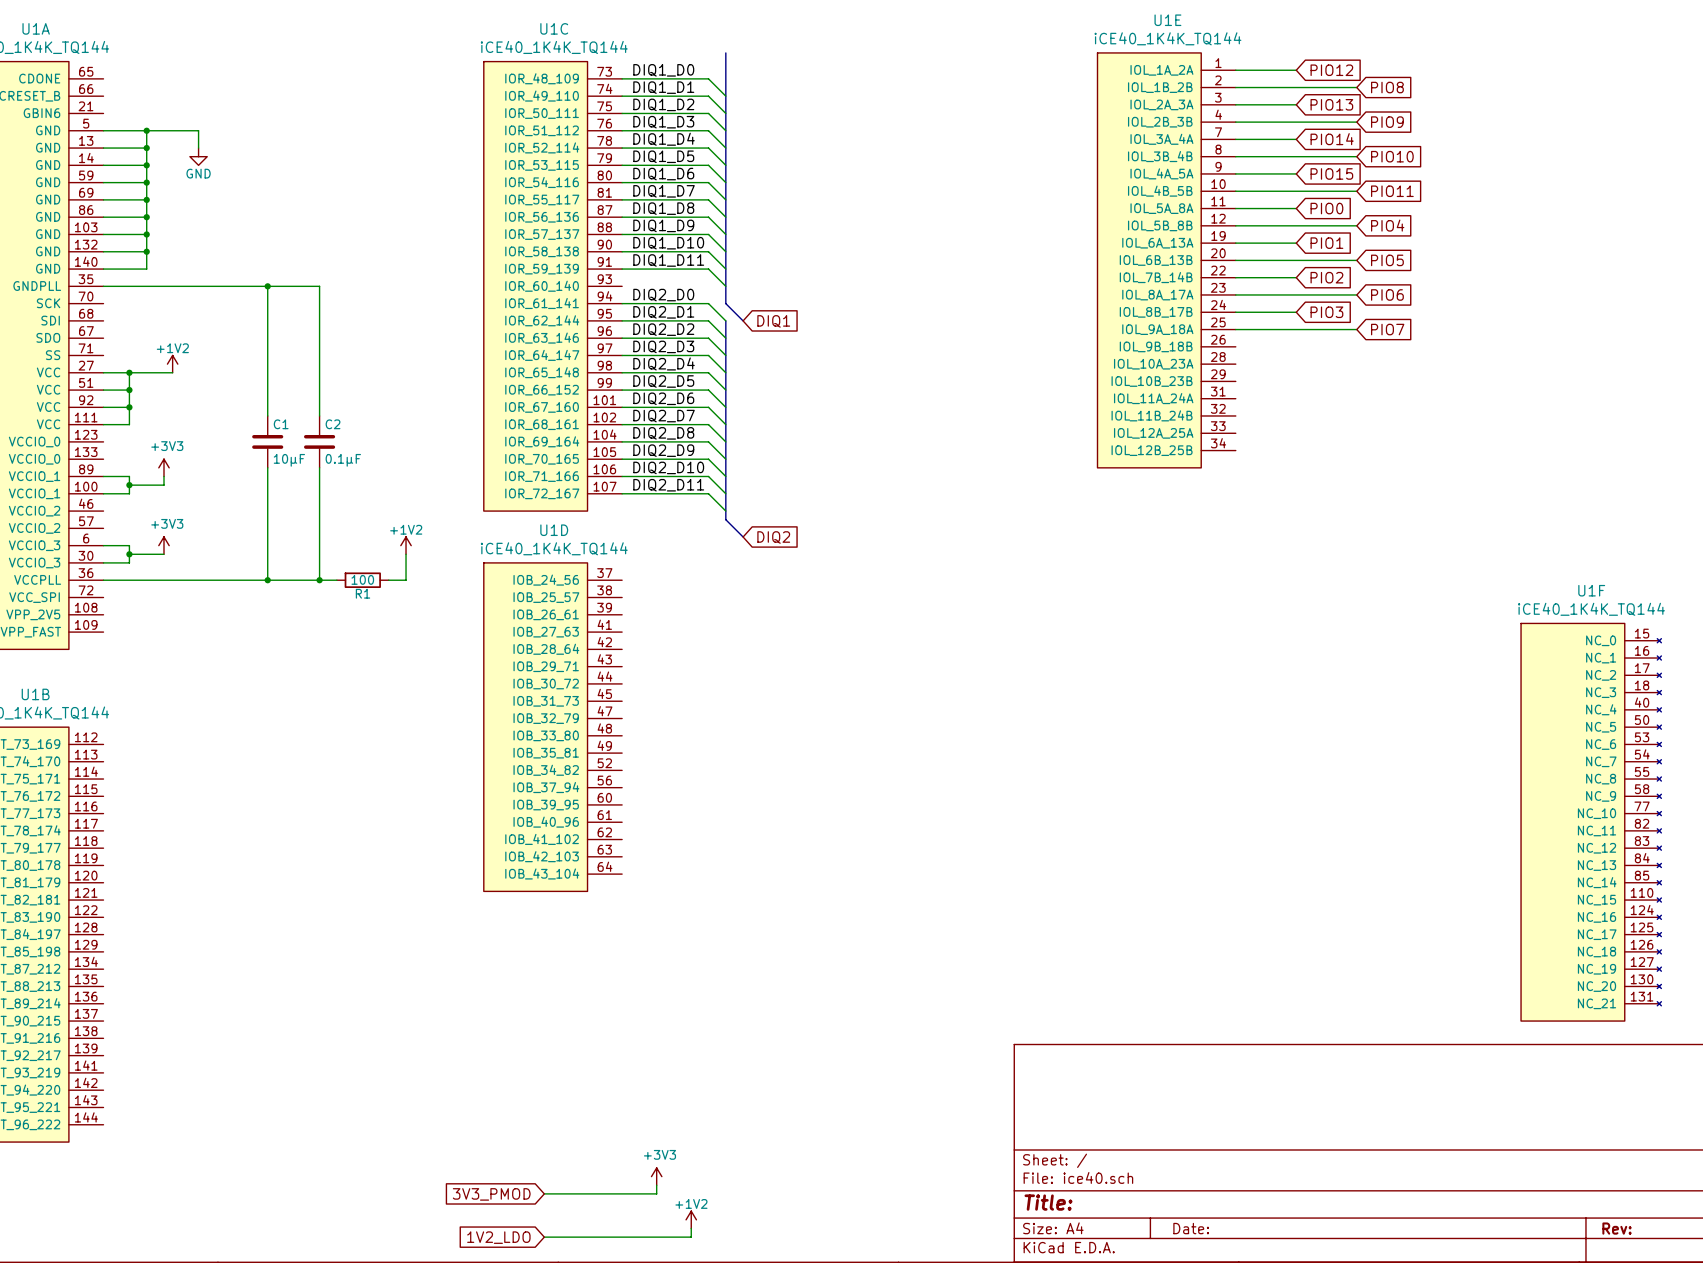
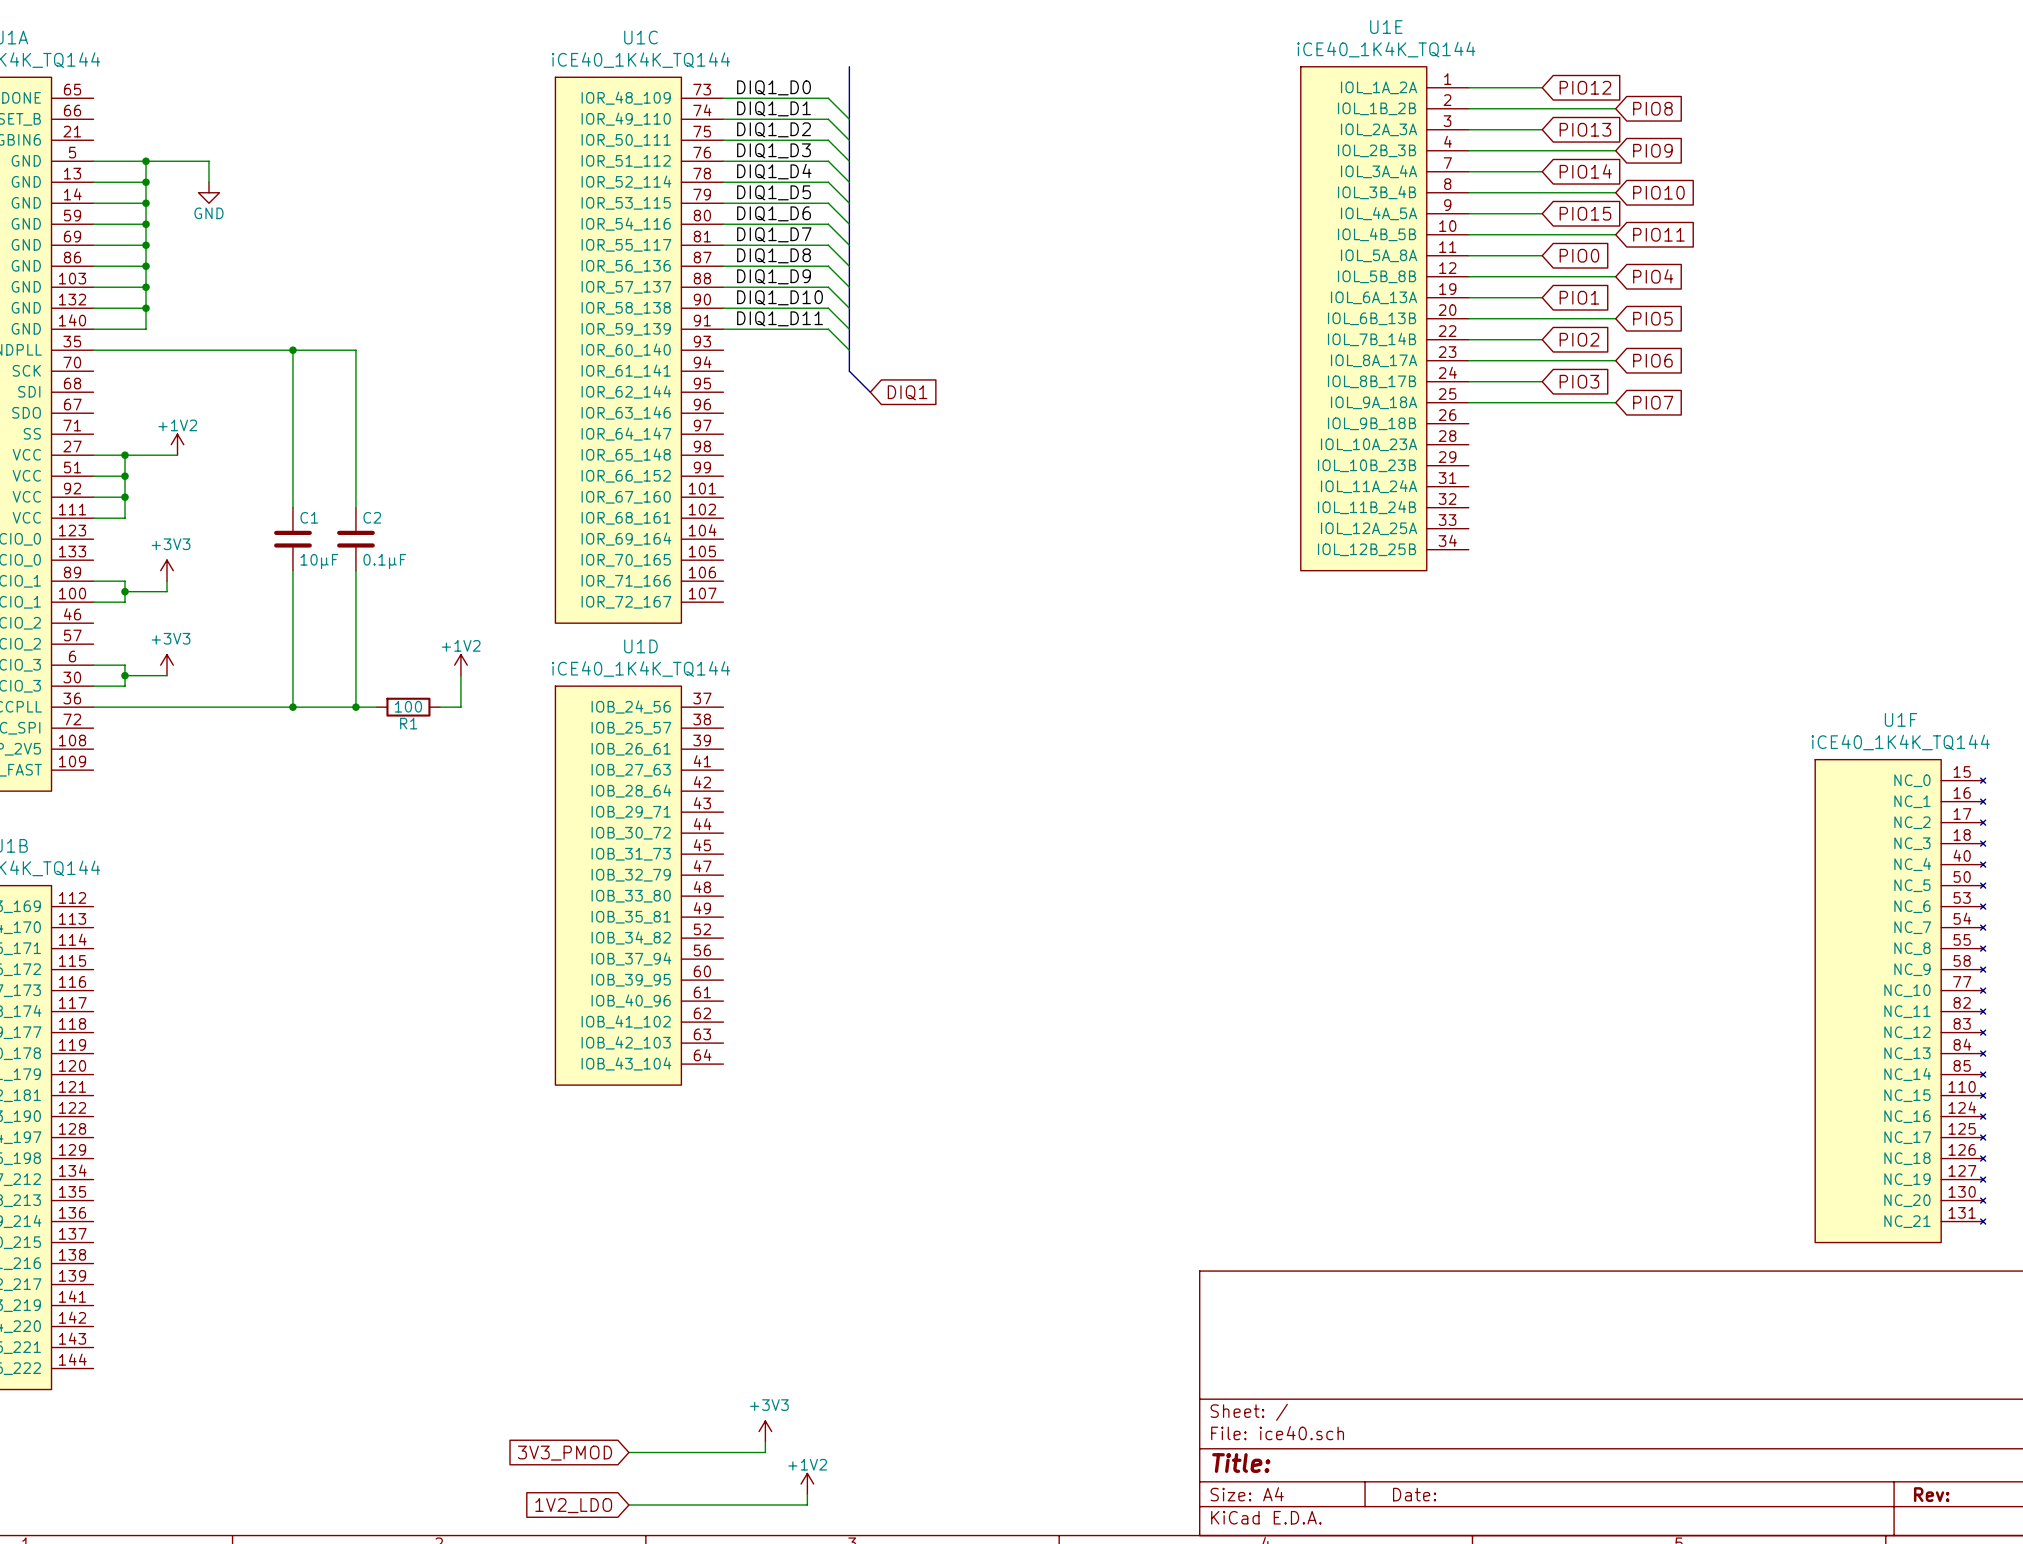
label: DIQ2_D0 (663, 295) -> none
wire: (622, 303) (708, 303) (725, 320) -> none
label: DIQ2_D1 (663, 312) -> none
wire: (622, 320) (708, 320) (725, 338) -> none
bus: (725, 320) (725, 519) (743, 537) -> none
label: DIQ2_D2 (663, 329) -> none
wire: (622, 338) (708, 338) (725, 355) -> none
label: DIQ2_D3 (663, 346) -> none
wire: (622, 355) (708, 355) (725, 372) -> none
label: DIQ2_D4 (664, 363) -> none
wire: (622, 372) (708, 372) (725, 390) -> none
label: DIQ2_D5 (663, 381) -> none
wire: (622, 390) (708, 390) (725, 407) -> none
label: DIQ2_D6 (663, 398) -> none
wire: (622, 407) (708, 407) (725, 424) -> none
label: DIQ2_D7 (664, 416) -> none
wire: (622, 424) (708, 424) (725, 441) -> none
label: DIQ2_D8 (663, 433) -> none
wire: (622, 441) (708, 441) (725, 459) -> none
label: DIQ2_D9 (663, 450) -> none
wire: (622, 459) (708, 459) (725, 476) -> none
label: DIQ2_D10 (668, 467) -> none
wire: (622, 476) (708, 476) (725, 493) -> none
label: DIQ2_D11 (668, 485) -> none
wire: (622, 493) (708, 493) (725, 511) -> none
global label: DIQ2 (773, 537) -> none

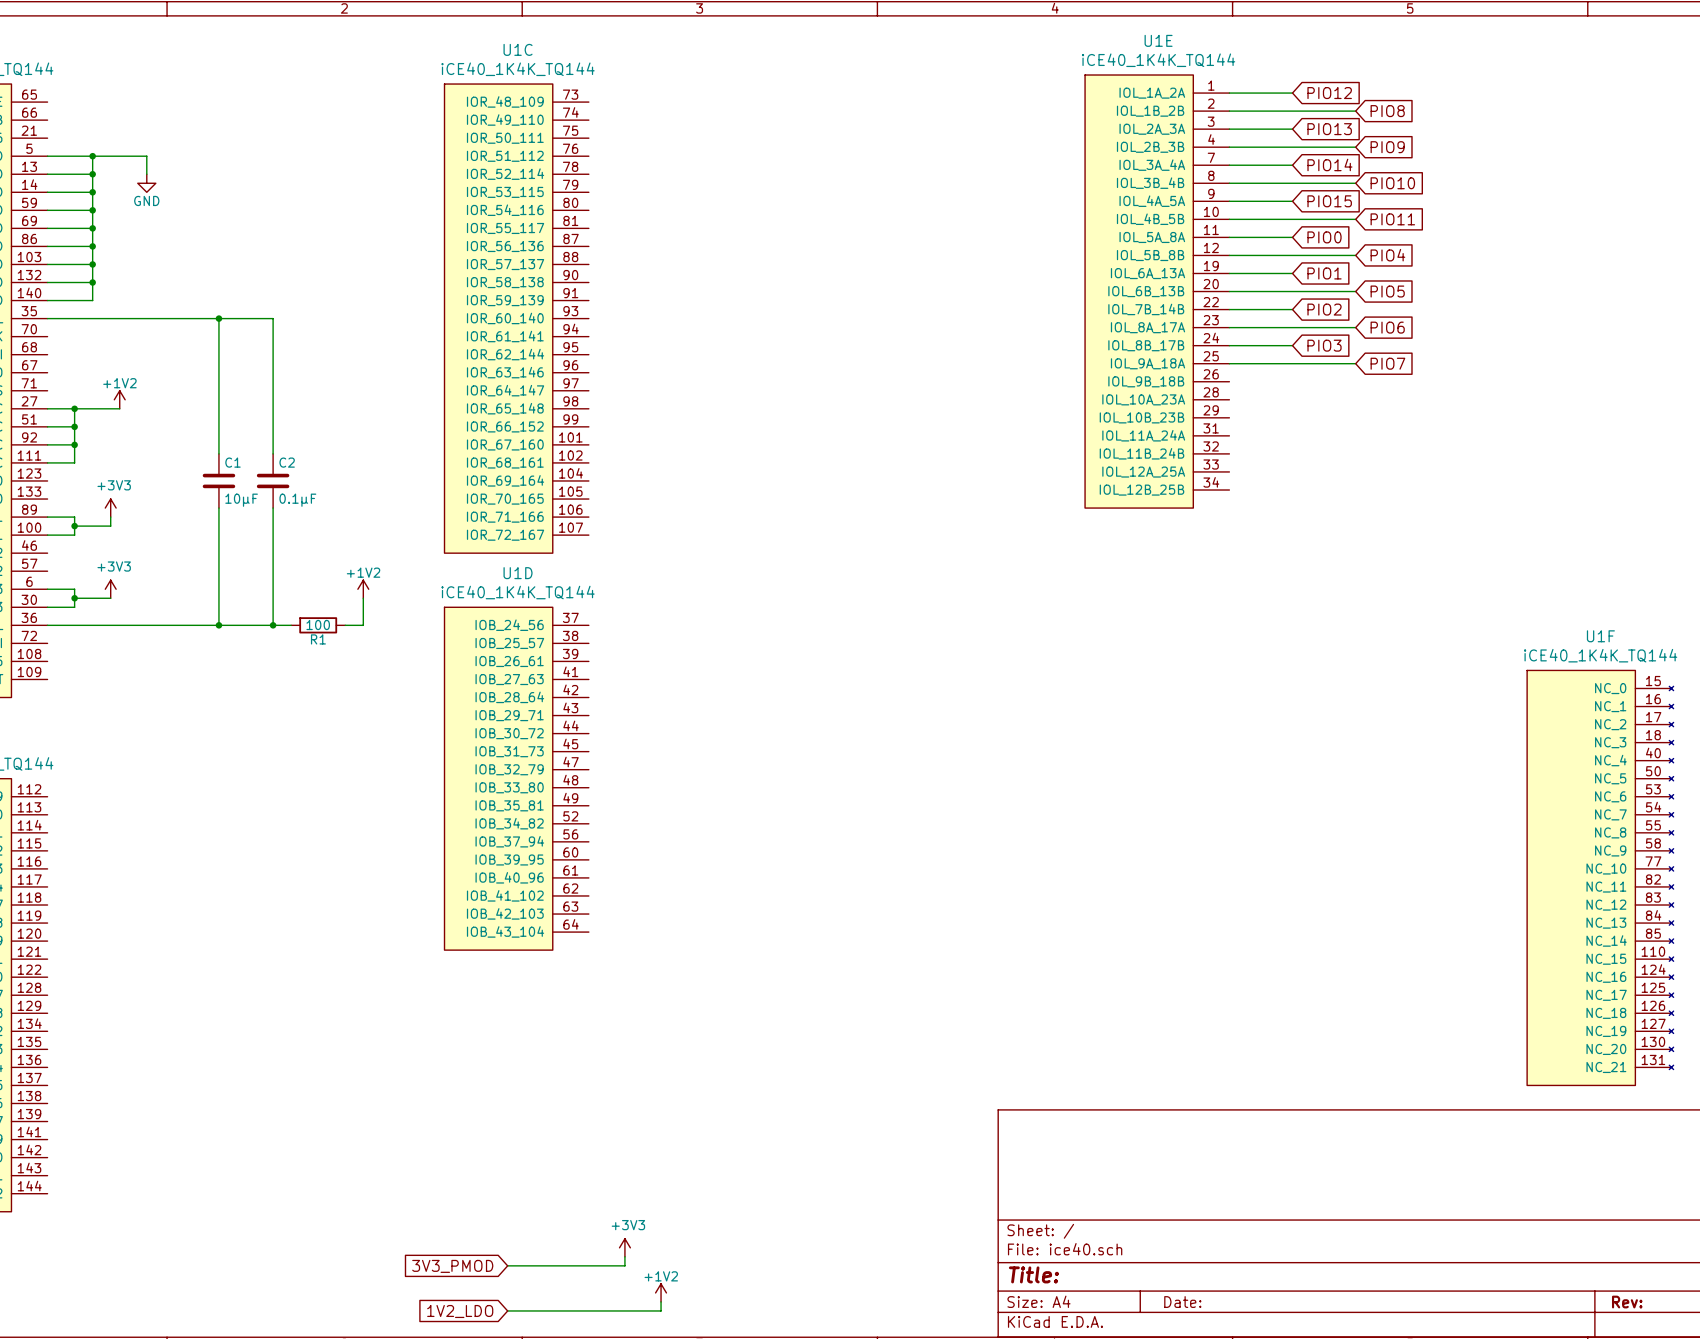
bus: (849, 66) (849, 371) (870, 392) -> none
label: DIQ1_D0 (774, 87) -> none
wire: (723, 98) (828, 98) (849, 119) -> none
label: DIQ1_D1 (774, 108) -> none
wire: (723, 119) (828, 119) (849, 140) -> none
label: DIQ1_D2 (774, 129) -> none
wire: (723, 140) (828, 140) (849, 161) -> none
label: DIQ1_D3 (774, 150) -> none
wire: (723, 161) (828, 161) (849, 182) -> none
label: DIQ1_D4 (774, 171) -> none
wire: (723, 182) (828, 182) (849, 203) -> none
label: DIQ1_D5 (774, 192) -> none
wire: (723, 203) (828, 203) (849, 224) -> none
label: DIQ1_D6 (774, 213) -> none
wire: (723, 224) (828, 224) (849, 245) -> none
label: DIQ1_D7 (774, 234) -> none
wire: (723, 245) (828, 245) (849, 266) -> none
label: DIQ1_D8 (774, 255) -> none
wire: (723, 266) (828, 266) (849, 287) -> none
label: DIQ1_D9 (774, 276) -> none
wire: (723, 287) (828, 287) (849, 308) -> none
label: DIQ1_D10 (780, 297) -> none
wire: (723, 308) (828, 308) (849, 329) -> none
label: DIQ1_D11 (780, 318) -> none
wire: (723, 329) (828, 329) (849, 350) -> none
global label: DIQ1 (907, 392) -> none

